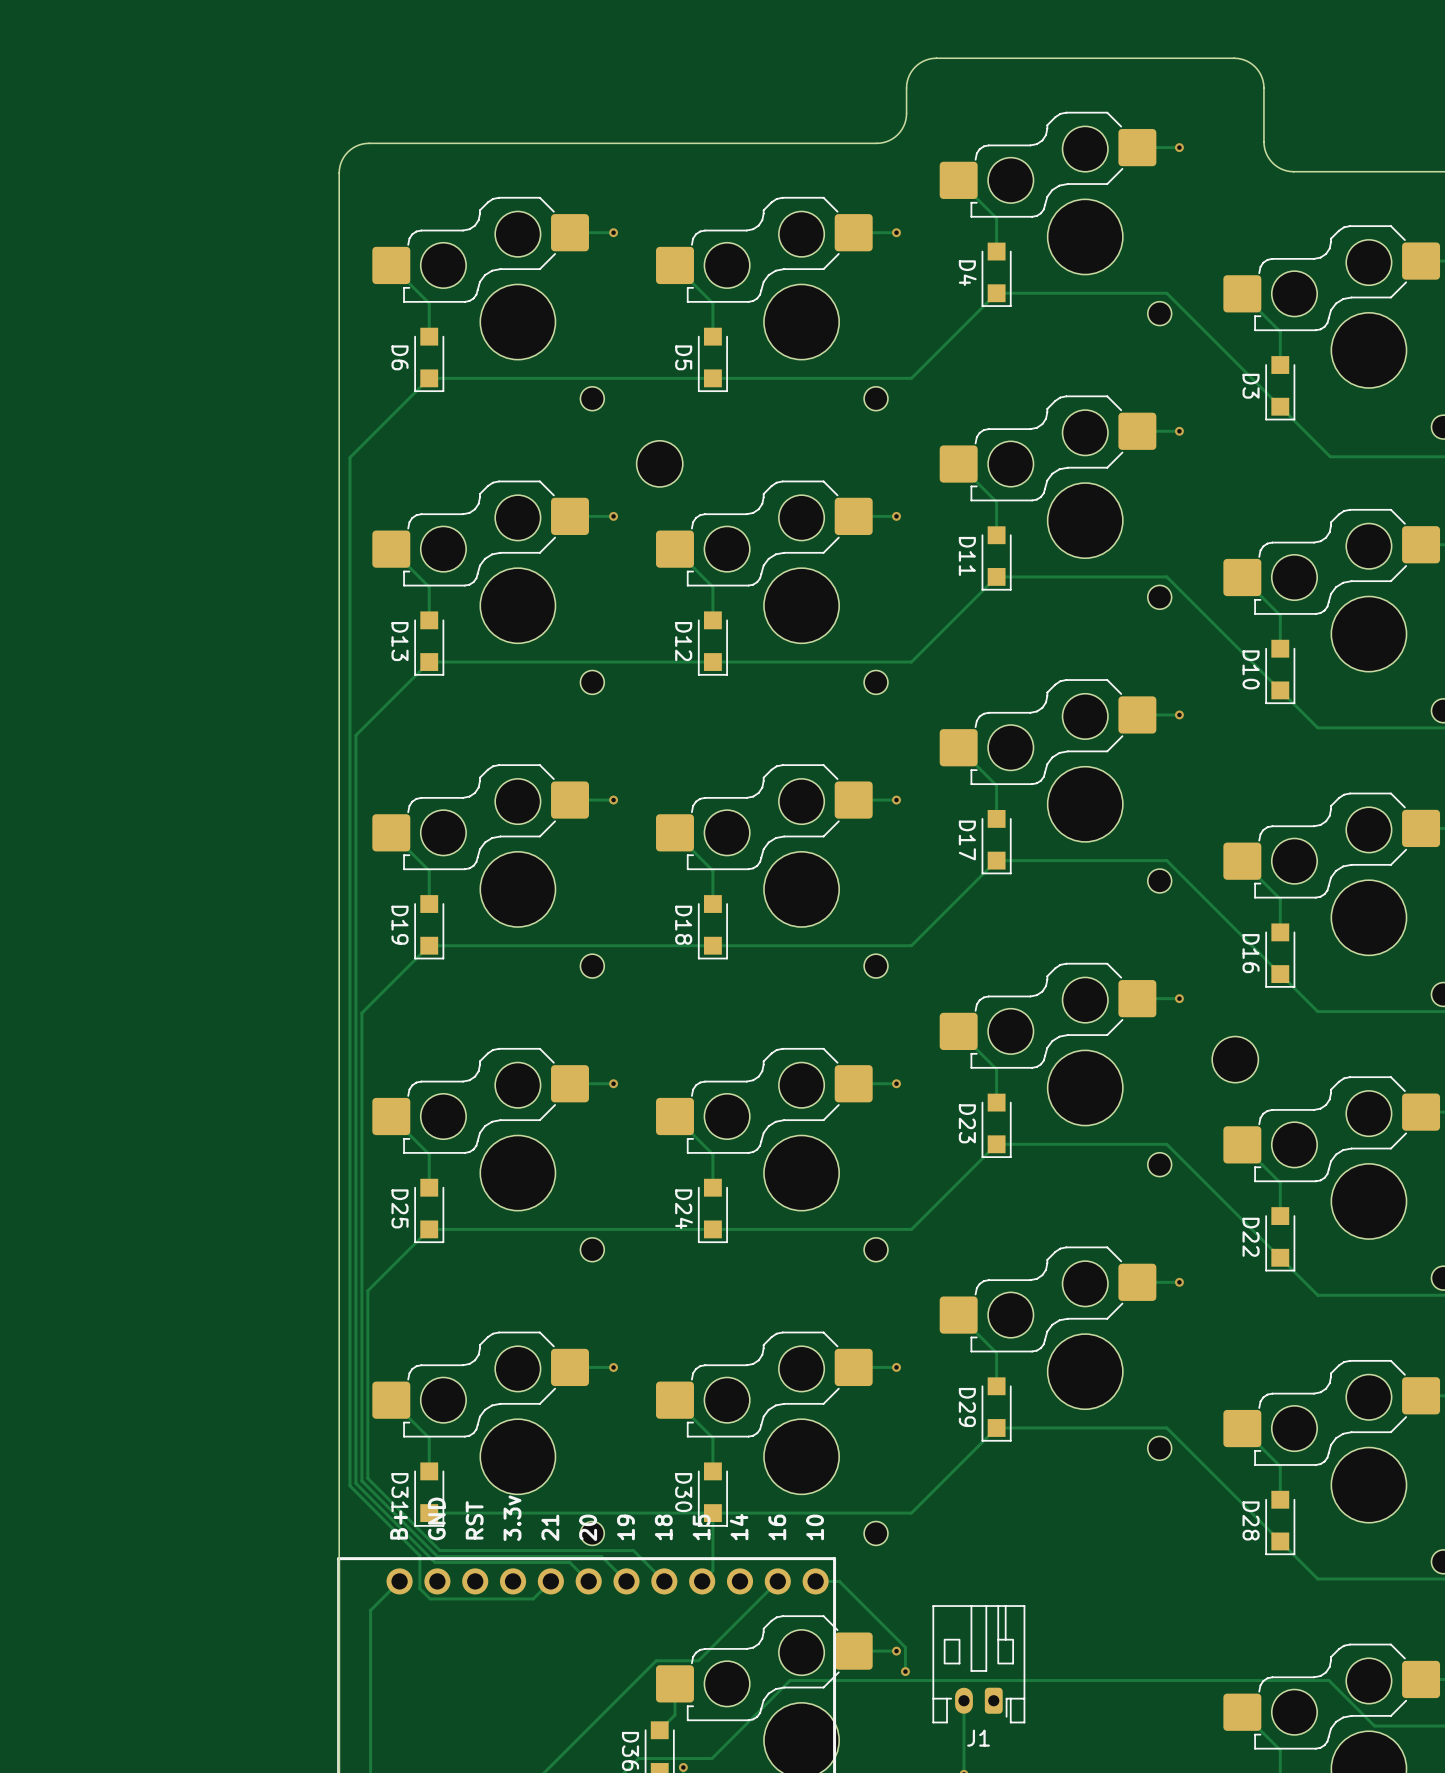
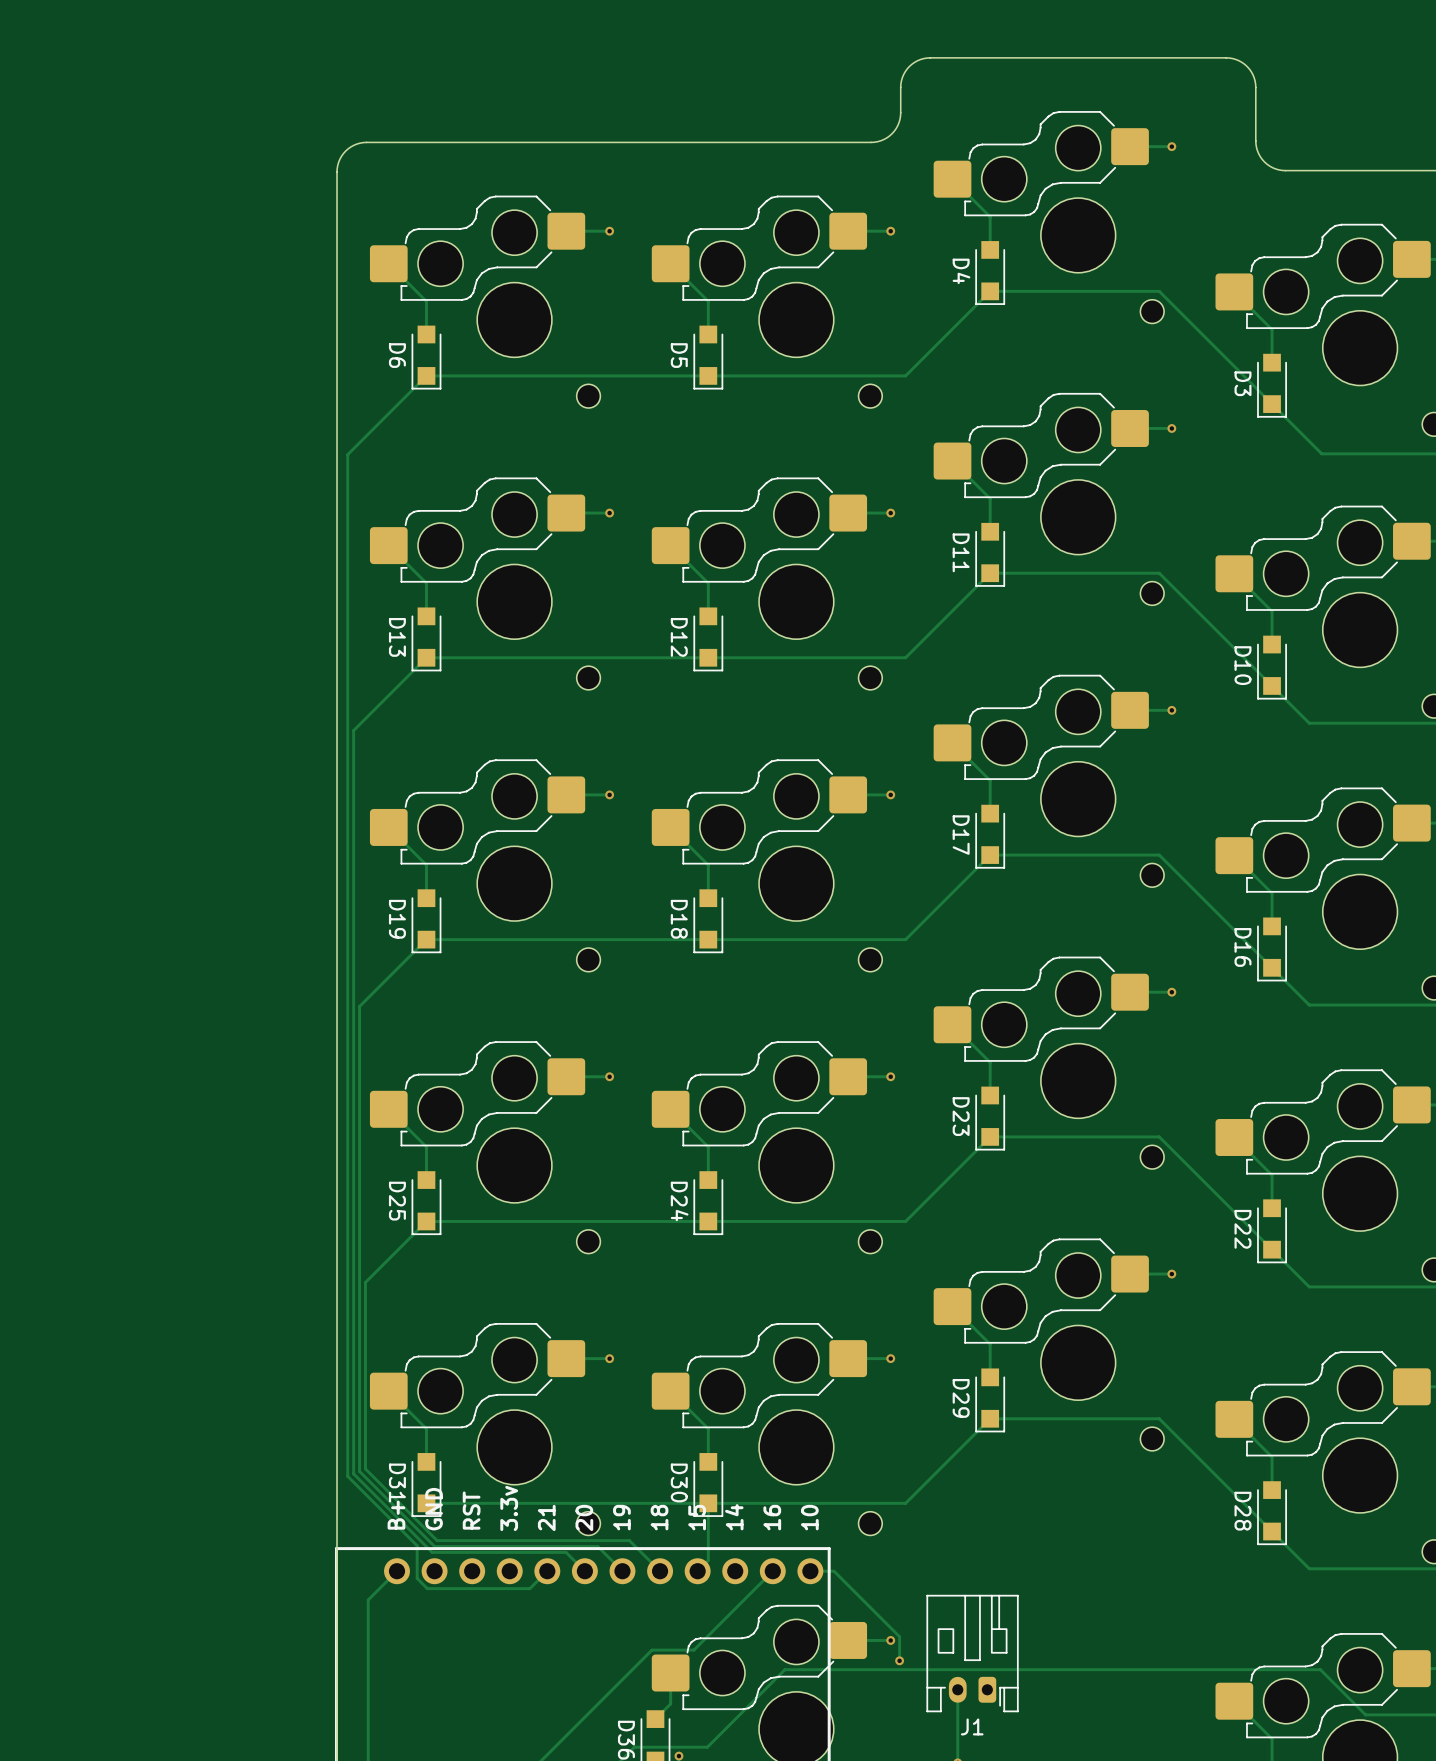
part: (659, 463) -> none
part: (1235, 1059) -> none

